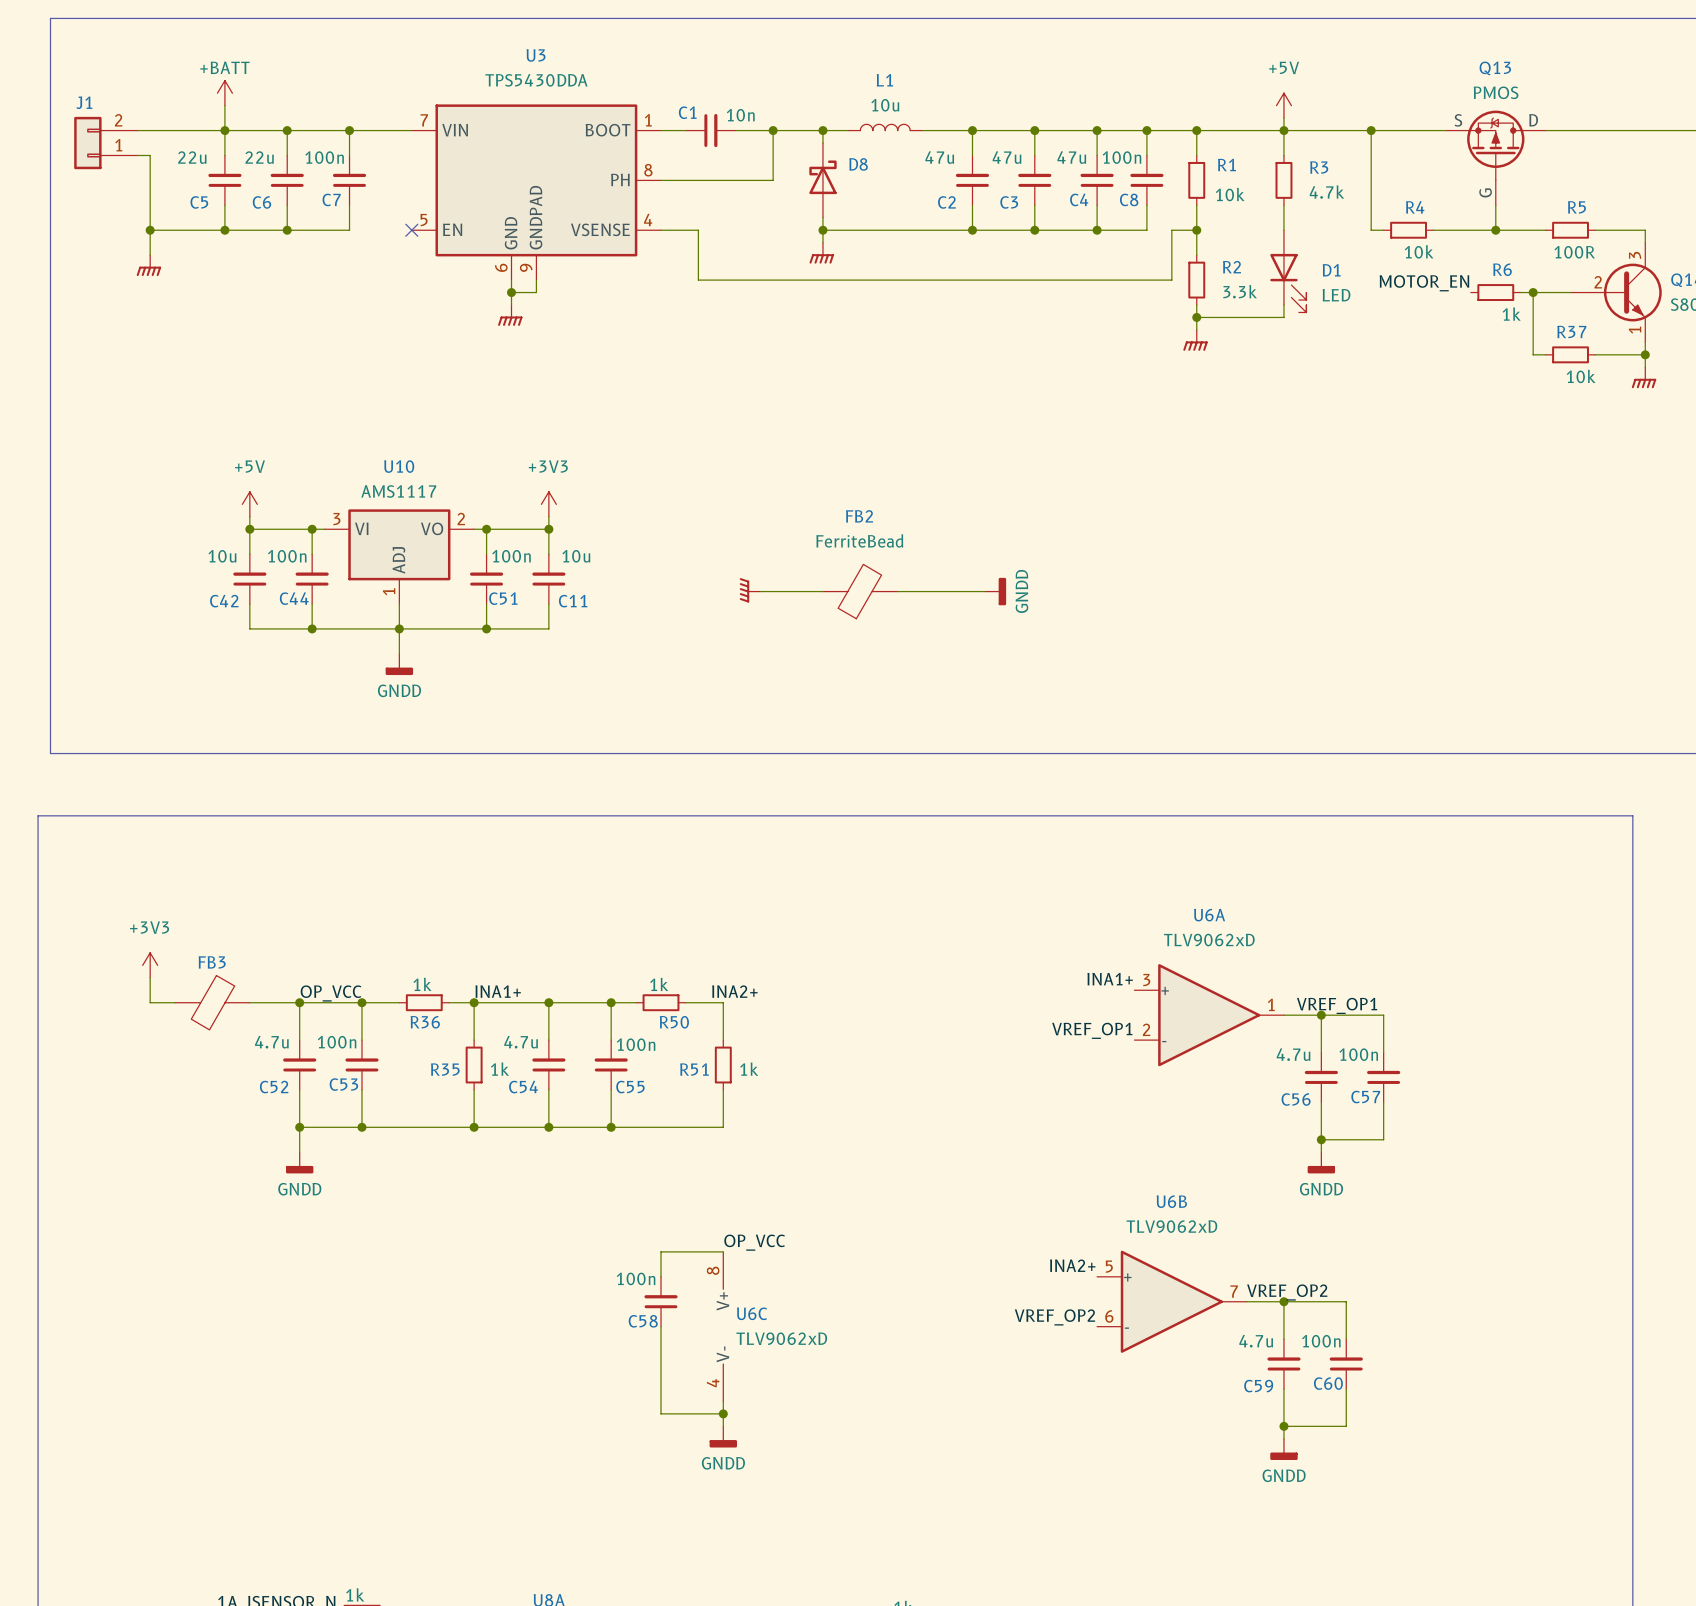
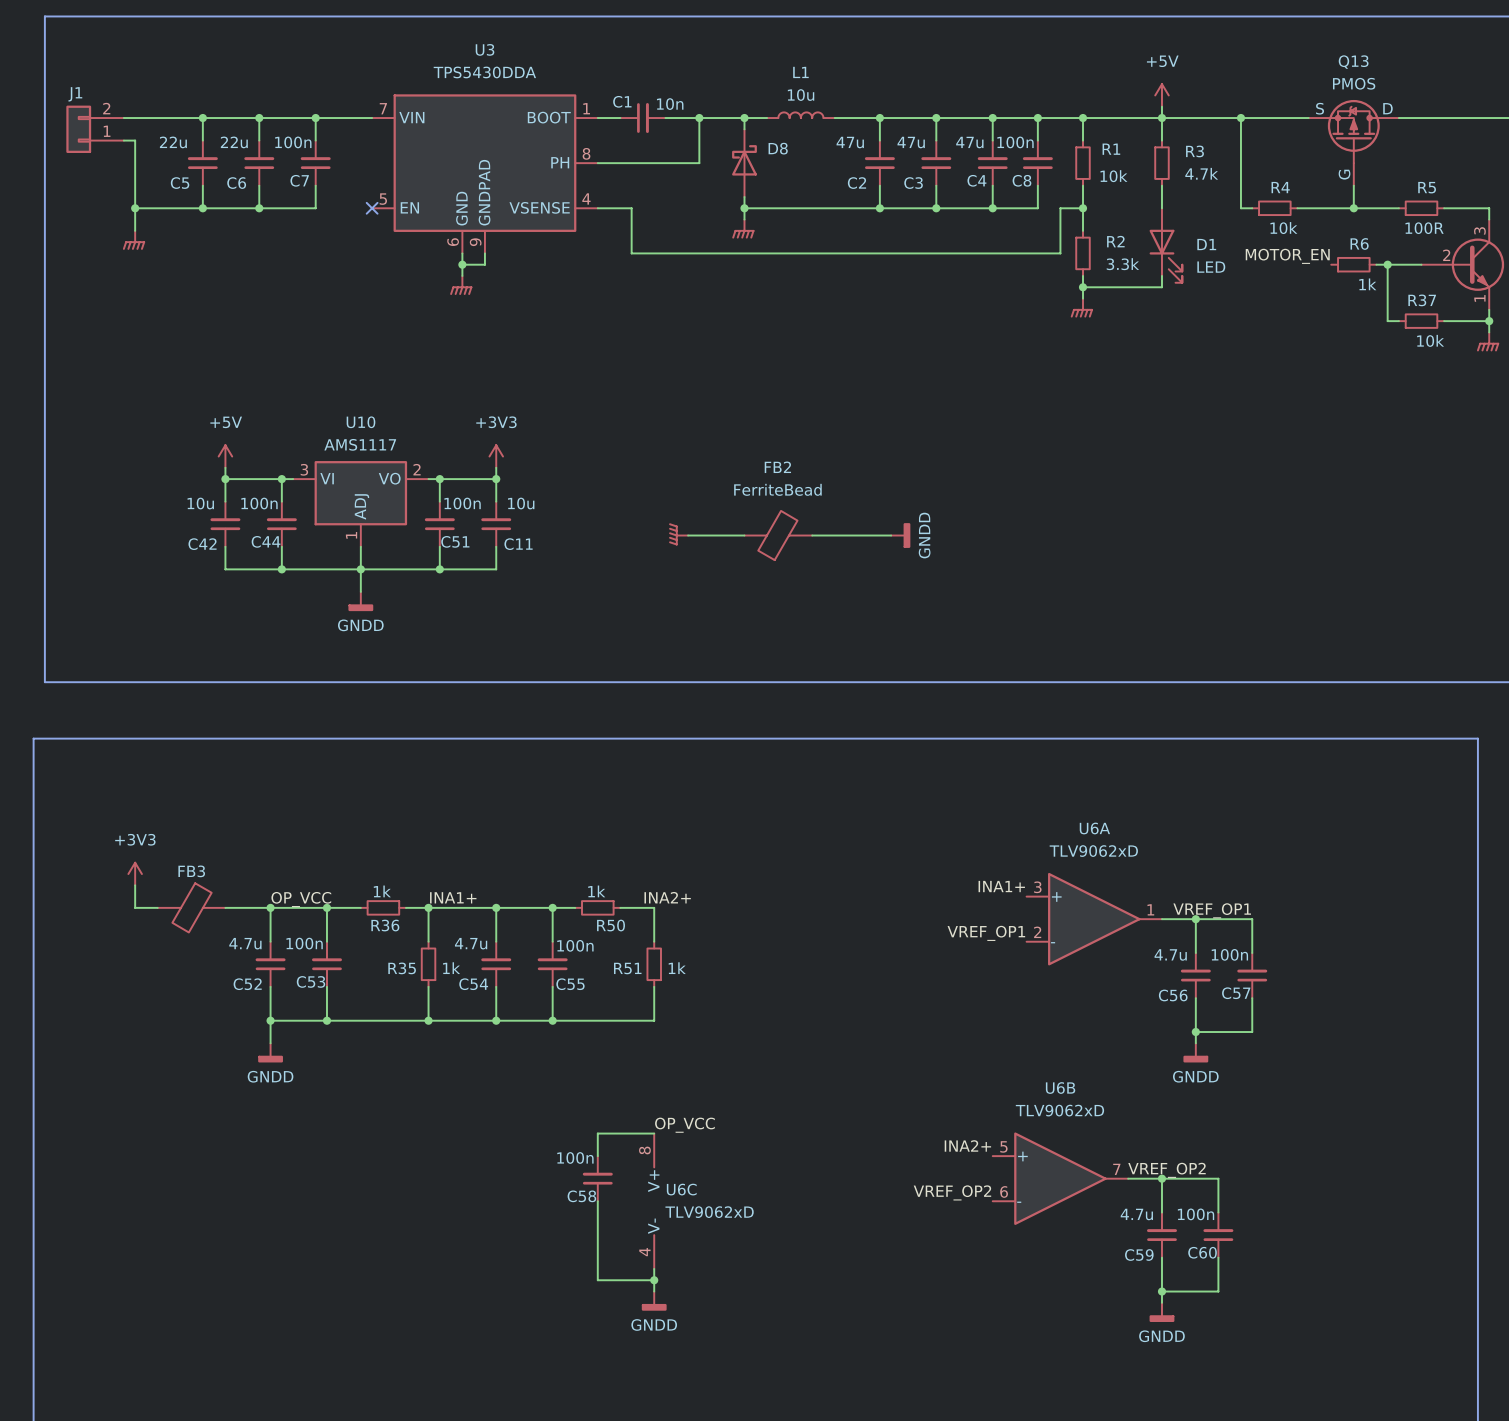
power symbol: +BATT (224, 93) -> none
wire: (224, 105) (224, 130) -> none

